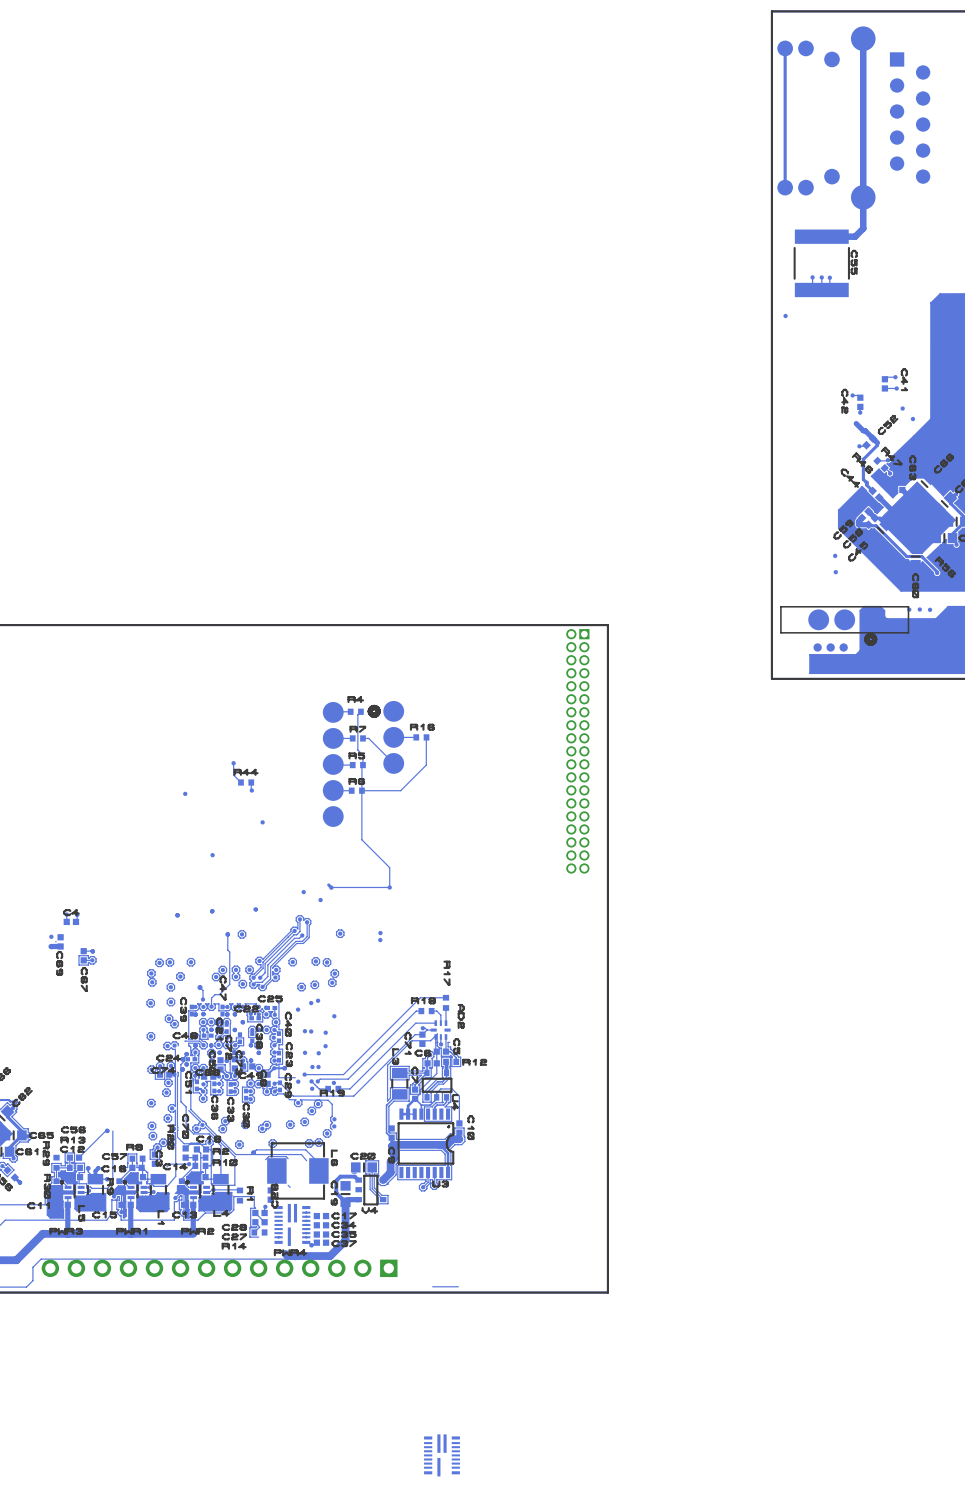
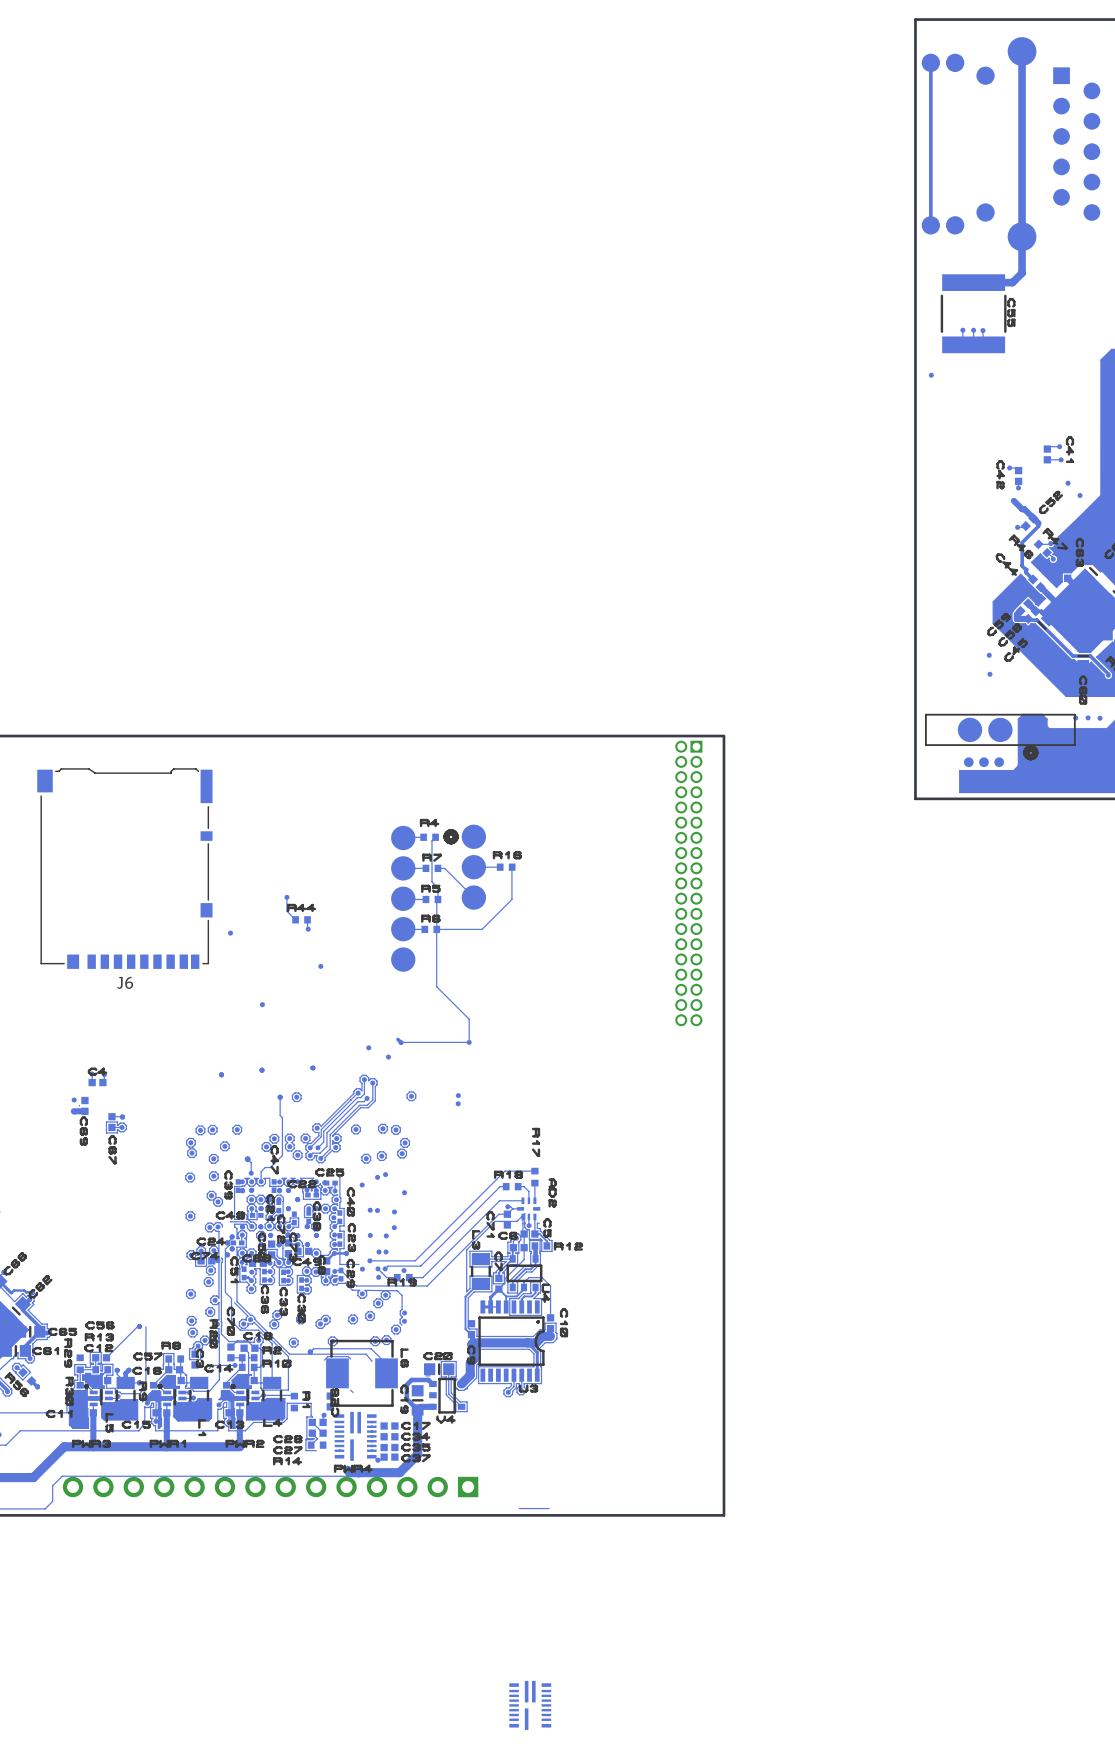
J6: none -> (124, 868)

